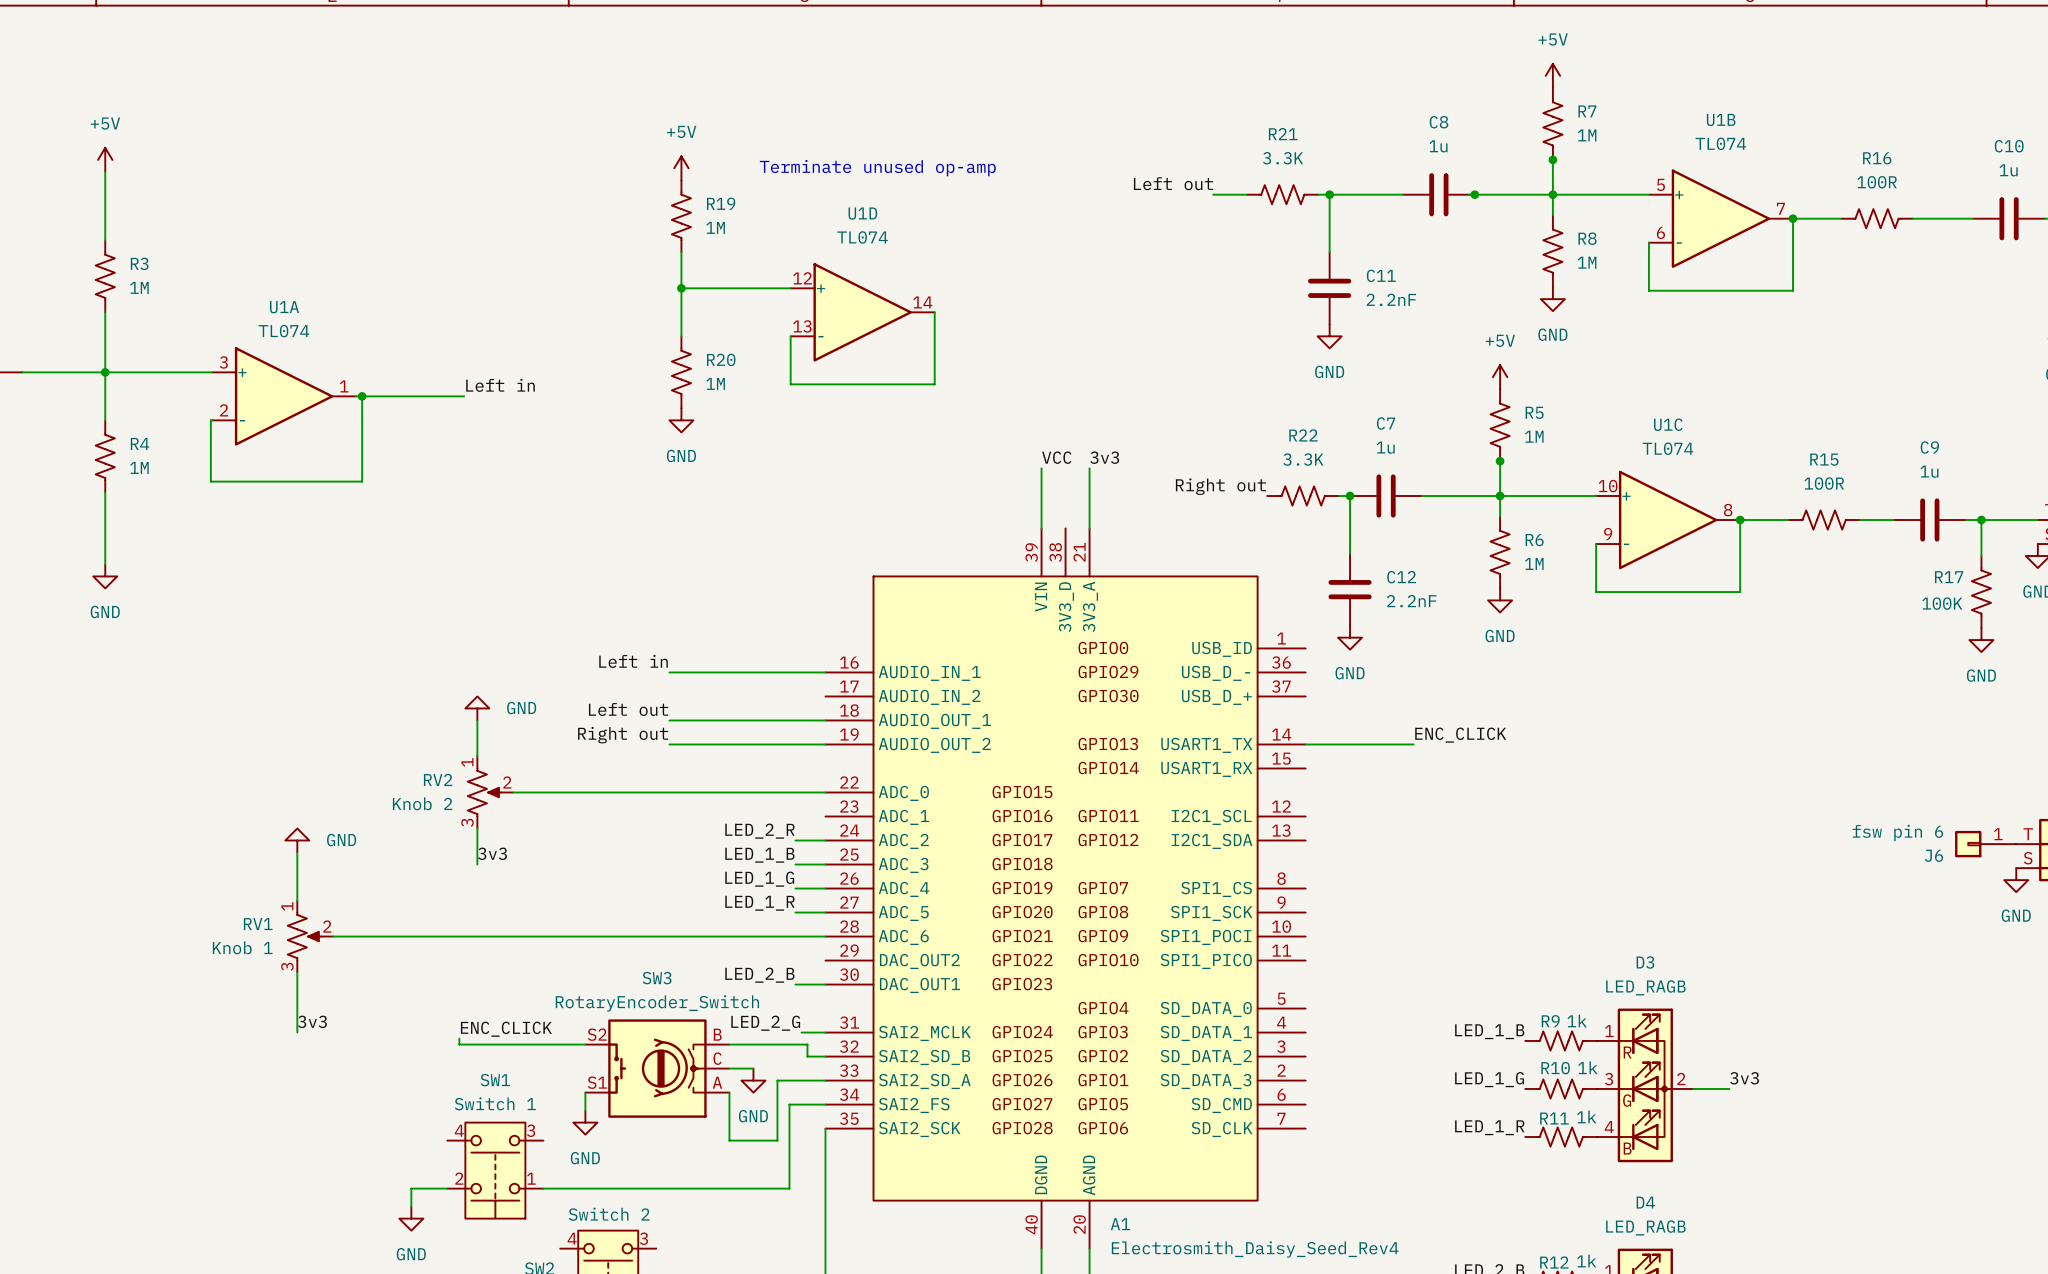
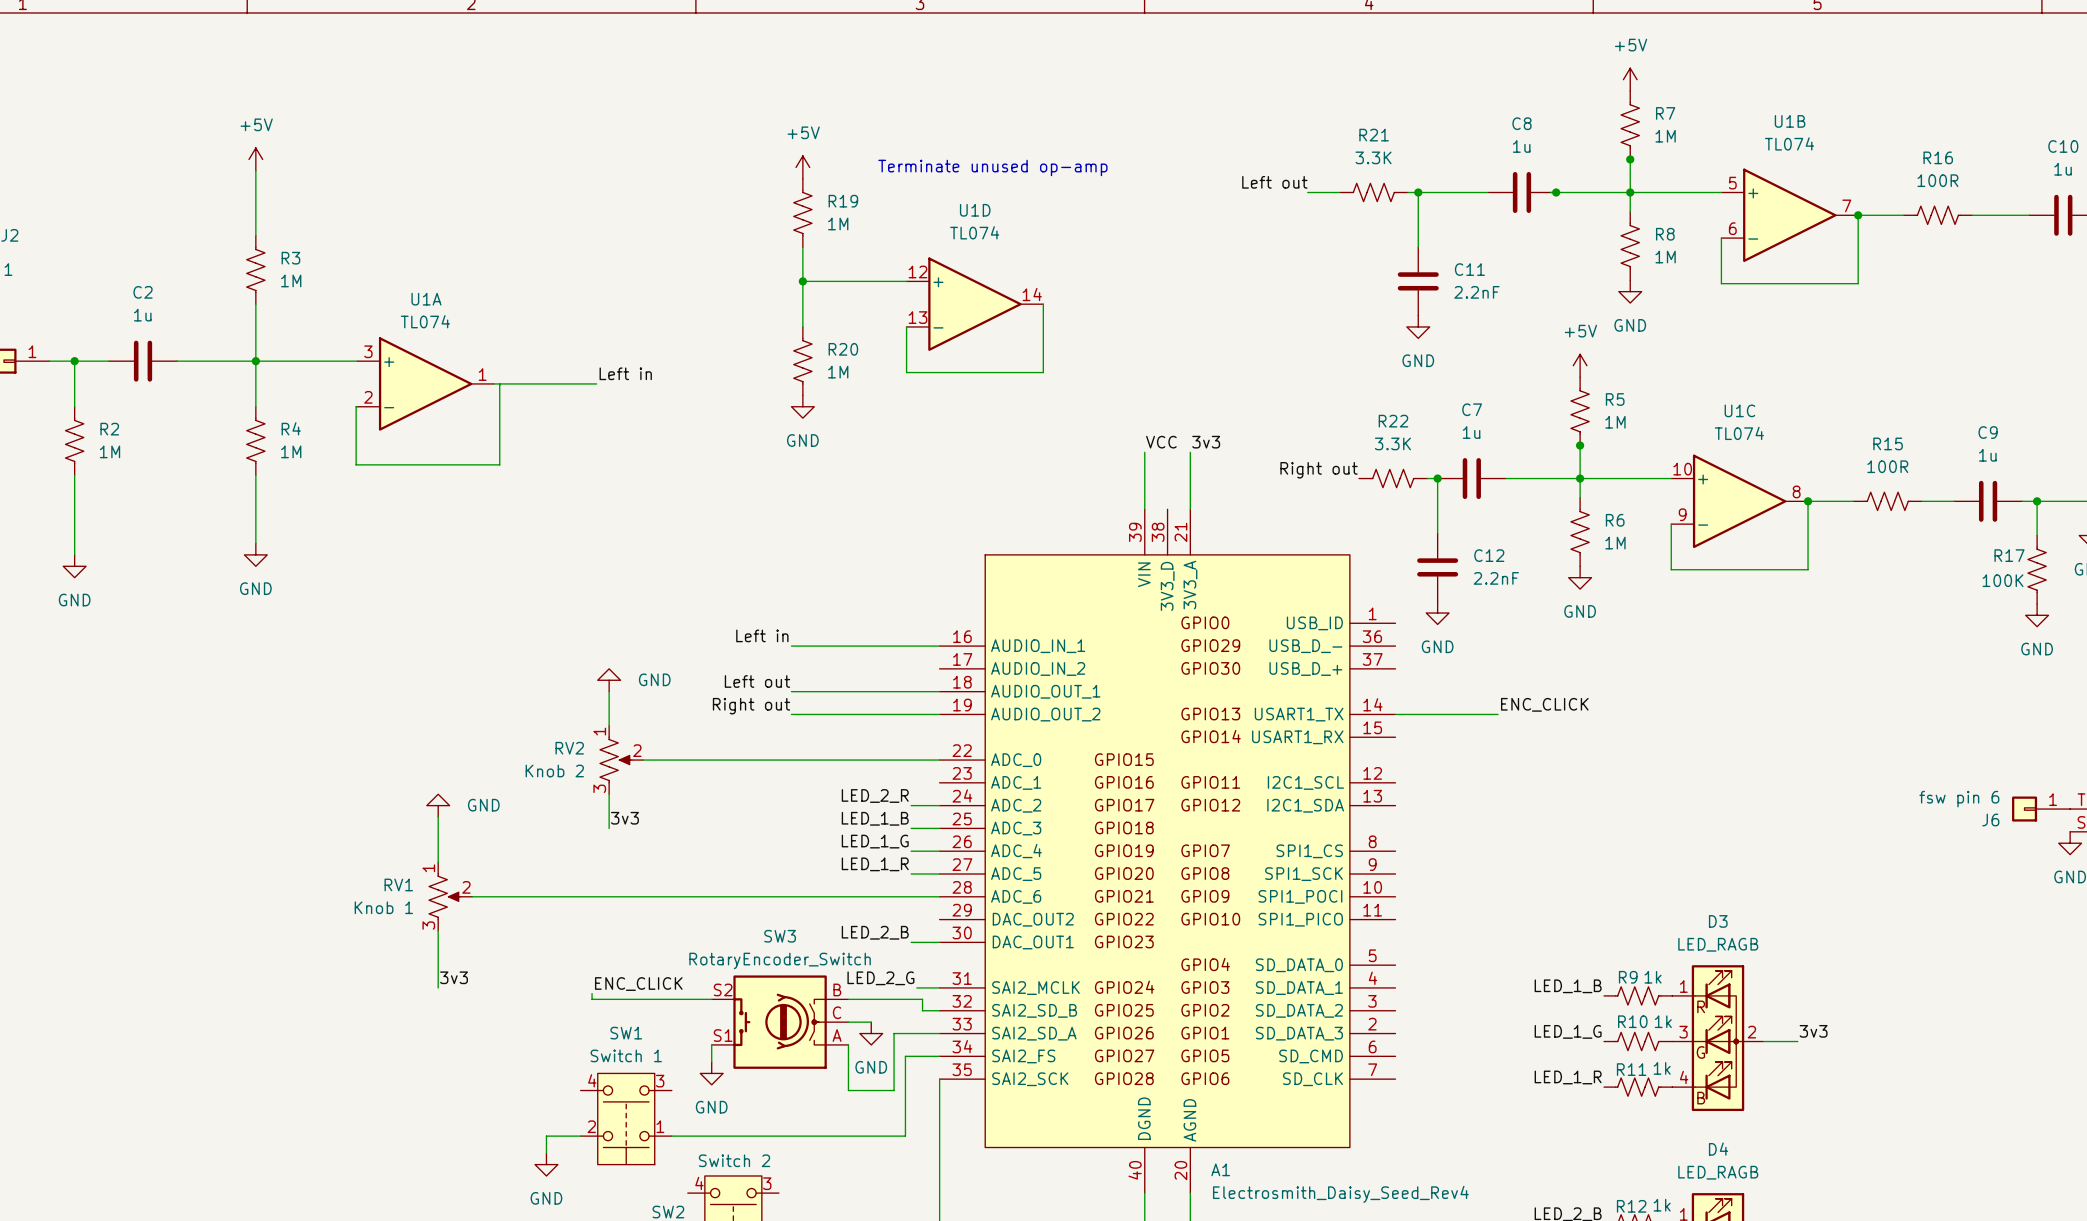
junction: (362, 396) -> none

